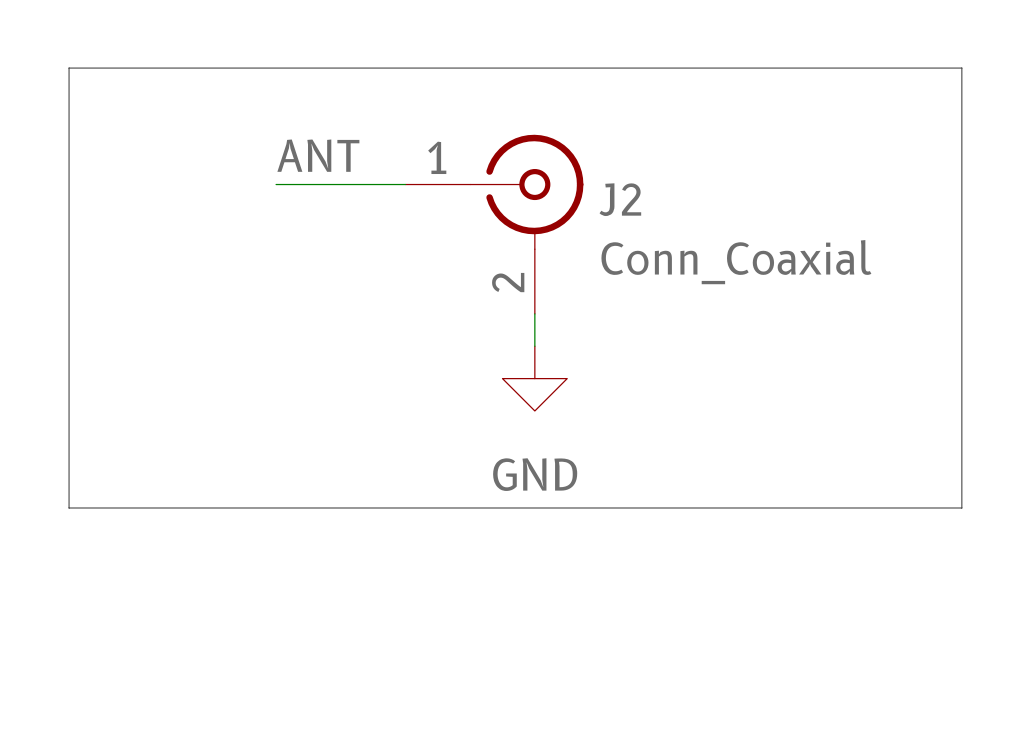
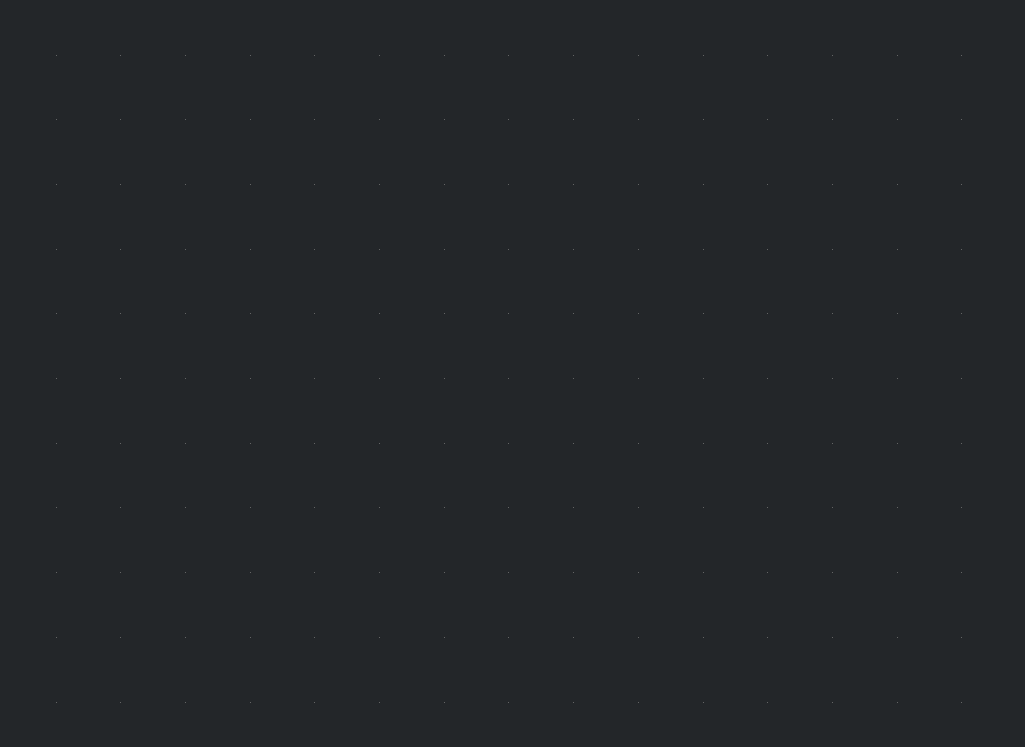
line: (69, 68) (69, 507) (961, 507) (961, 68) (69, 68) -> none
label: ANT (318, 155) -> none
wire: (276, 184) (405, 184) -> none
J2: Conn_Coaxial (494, 224) -> none
wire: (534, 313) (534, 346) -> none
power symbol: GND (534, 378) -> none

